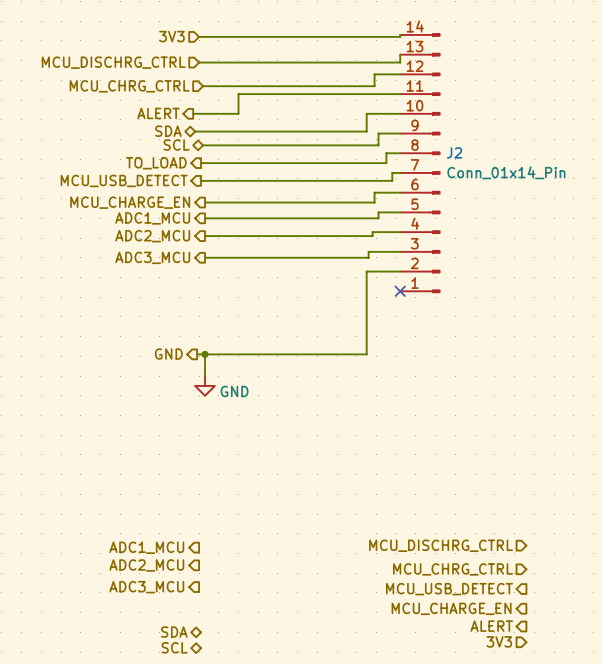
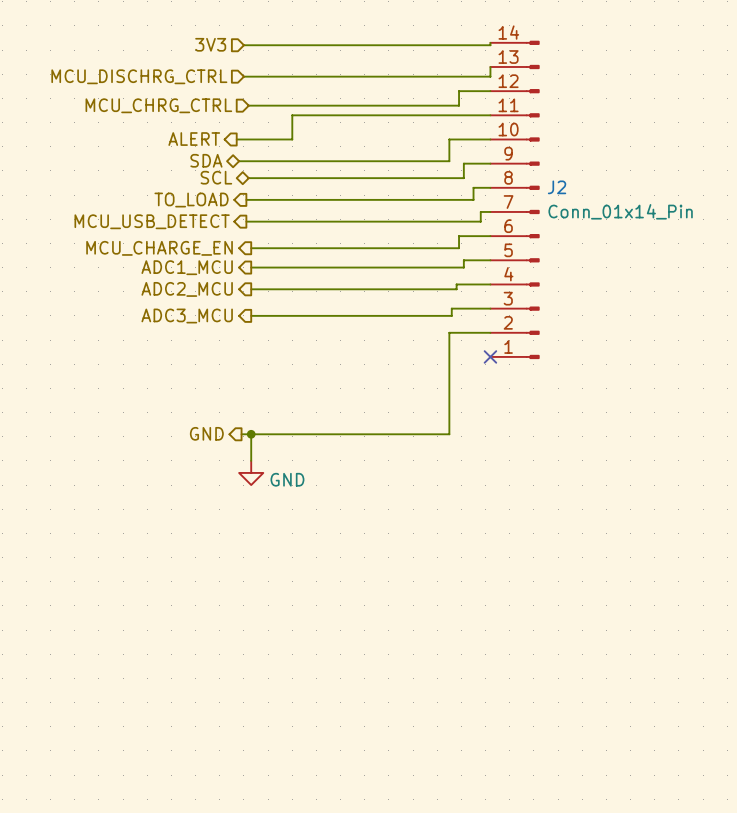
hierarchical label: MCU_DISCHRG_CTRL (441, 545) -> none
hierarchical label: ADC1_MCU (146, 547) -> none
hierarchical label: ADC2_MCU (146, 565) -> none
hierarchical label: MCU_CHRG_CTRL (453, 569) -> none
hierarchical label: ADC3_MCU (146, 587) -> none
hierarchical label: MCU_USB_DETECT (449, 589) -> none
hierarchical label: MCU_CHARGE_EN (451, 608) -> none
hierarchical label: ALERT (491, 626) -> none
hierarchical label: SDA (174, 632) -> none
hierarchical label: 3V3 (499, 641) -> none
hierarchical label: SCL (174, 647) -> none

